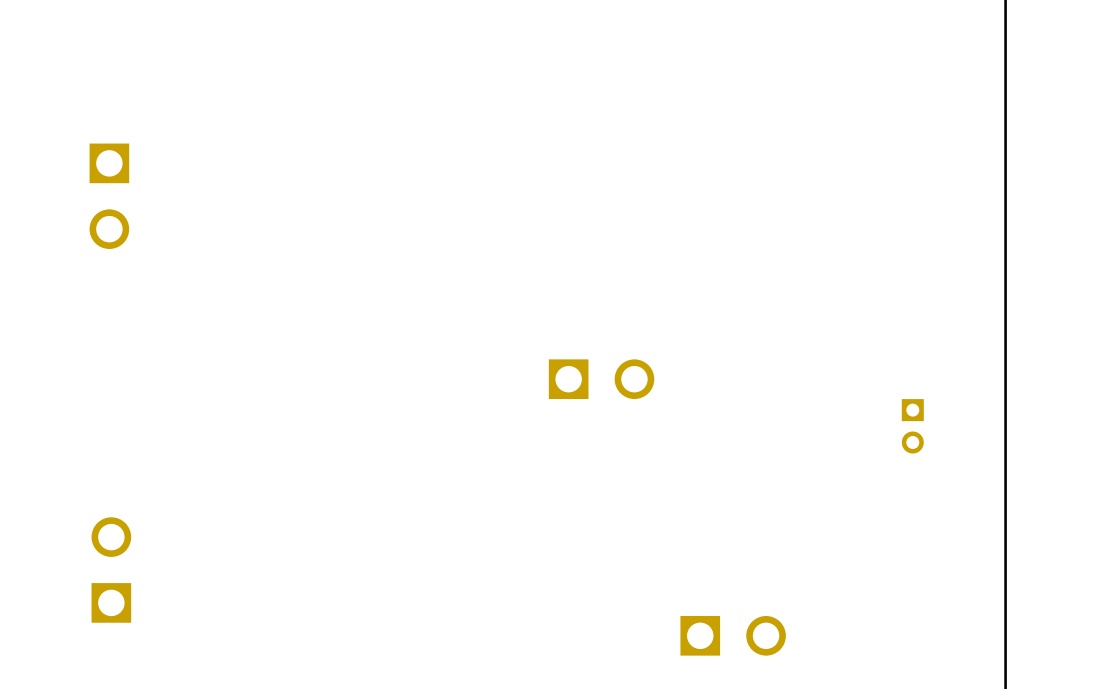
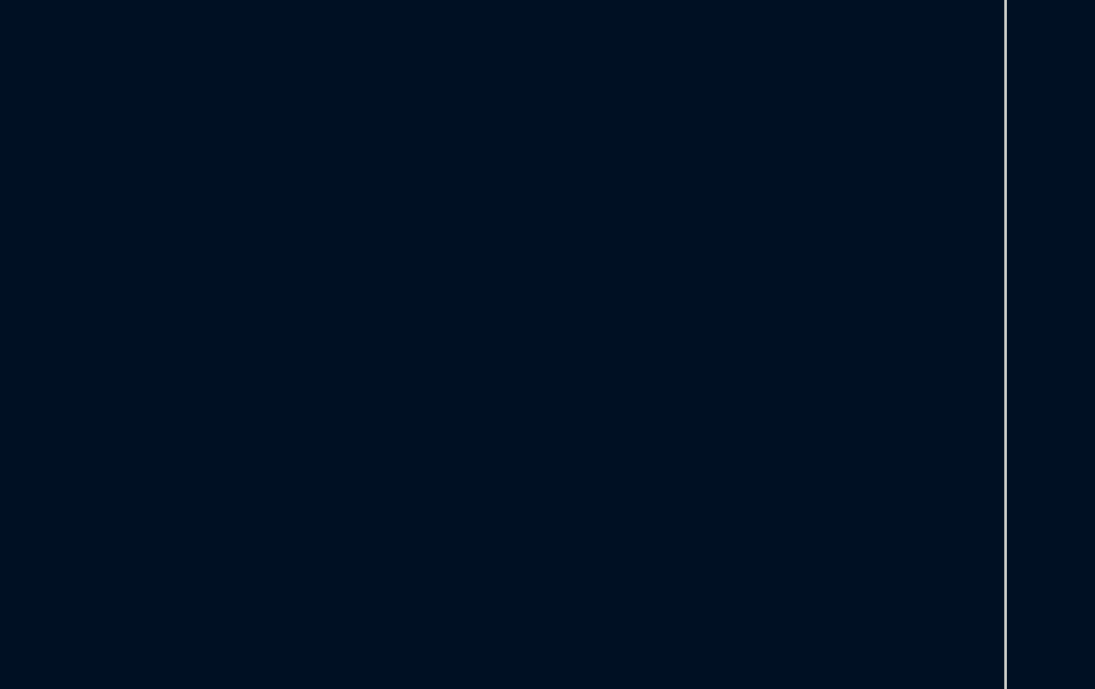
part: (109, 196) -> none
part: (601, 379) -> none
part: (912, 426) -> none
part: (111, 570) -> none
part: (733, 635) -> none

